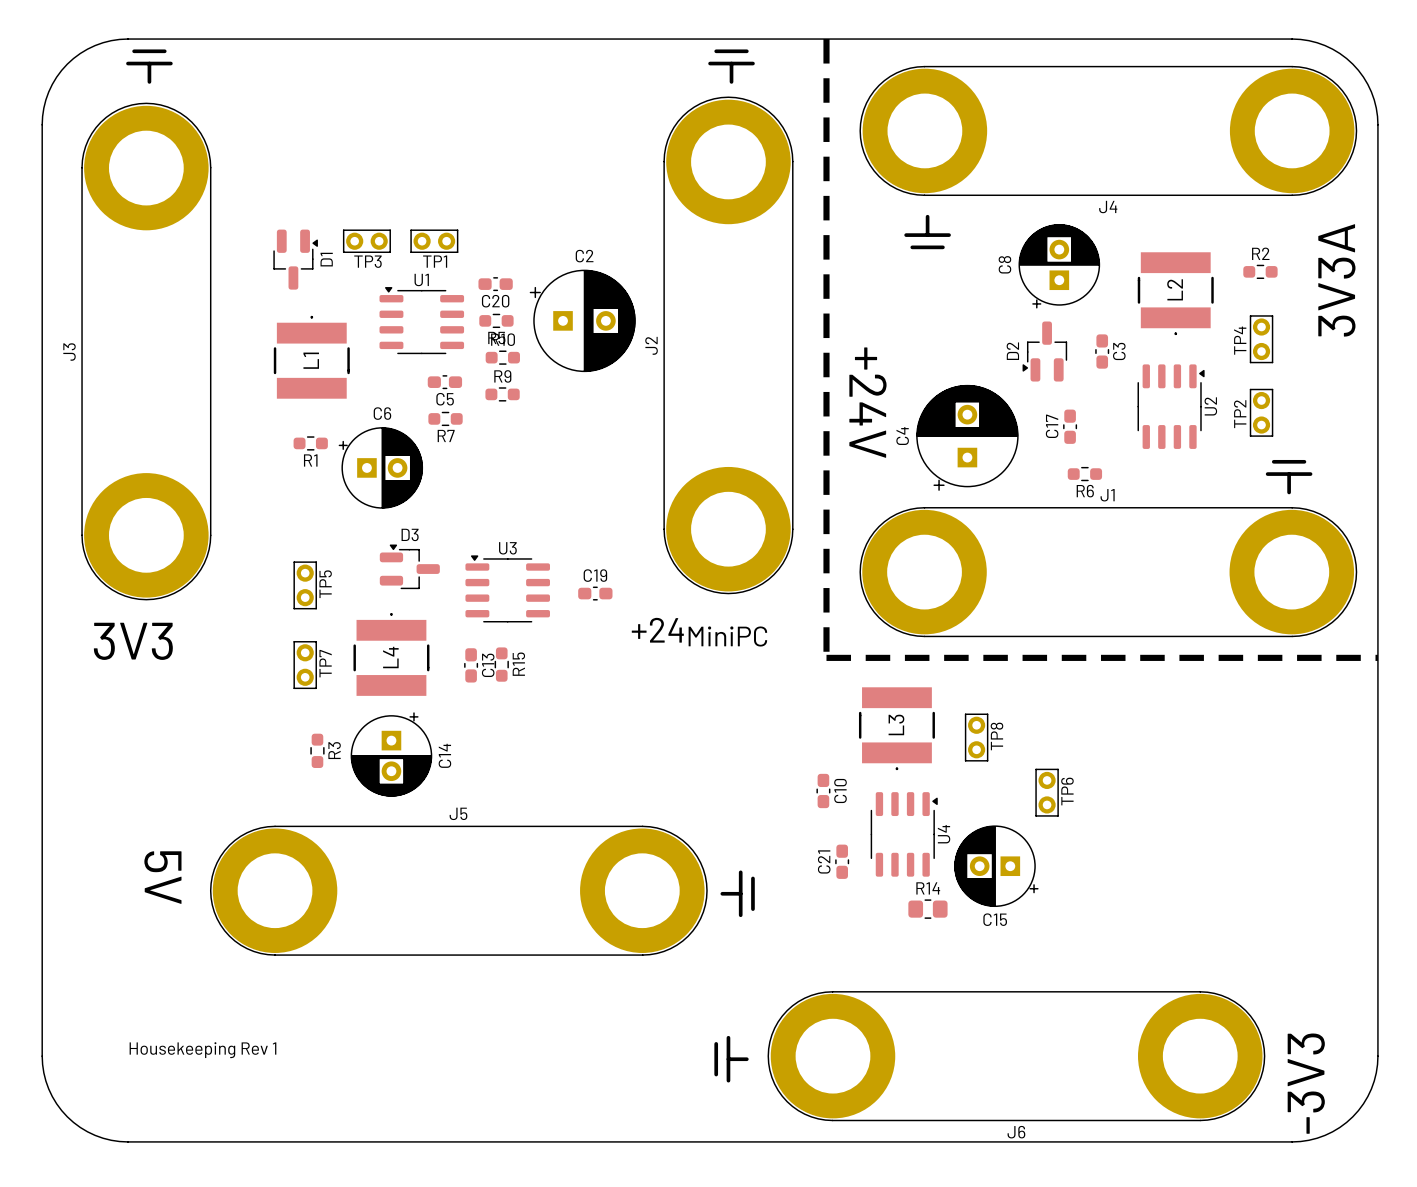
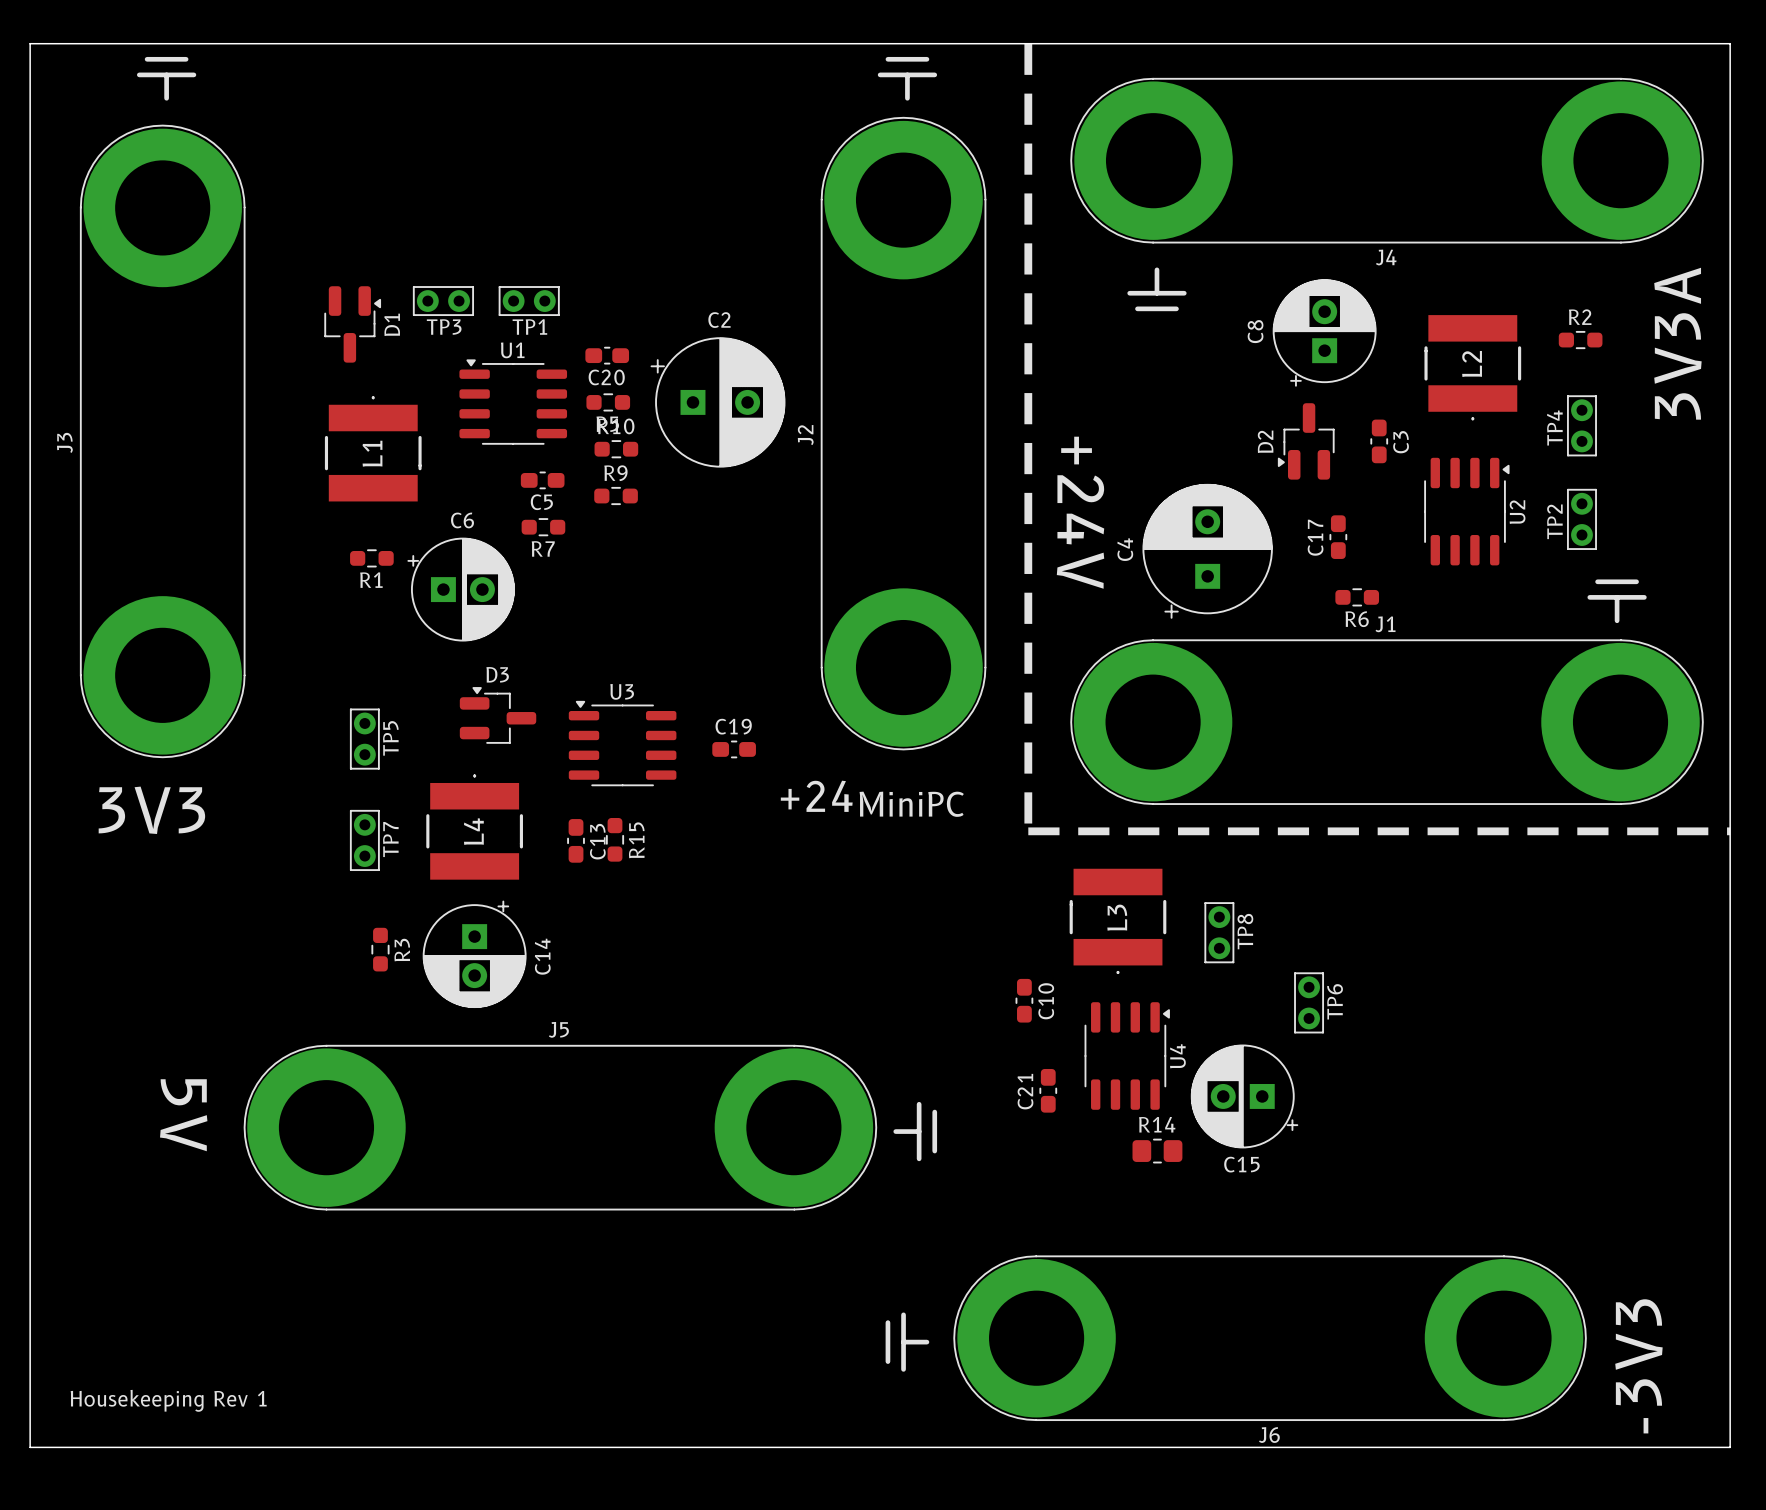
board edge: (127, 39) (111, 40) (95, 45) (80, 53) (67, 64) (56, 77) (48, 91) (43, 108) (42, 124) -> (139, 43) (30, 43) (30, 152)
board edge: (1292, 39) (1308, 40) (1324, 45) (1339, 53) (1352, 64) (1363, 77) (1371, 91) (1376, 108) (1377, 124) -> (1620, 43) (1730, 43) (1730, 152)
text position: Housekeeping Rev 1 (202, 1050) -> Housekeeping Rev 1 (168, 1400)
board edge: (42, 1056) (43, 1072) (48, 1088) (56, 1103) (67, 1116) (80, 1127) (95, 1135) (111, 1140) (127, 1141) -> (30, 1338) (30, 1447) (139, 1447)
board edge: (1377, 1056) (1376, 1072) (1371, 1088) (1363, 1103) (1352, 1116) (1339, 1127) (1324, 1135) (1308, 1140) (1292, 1141) -> (1730, 1338) (1730, 1447) (1620, 1447)

